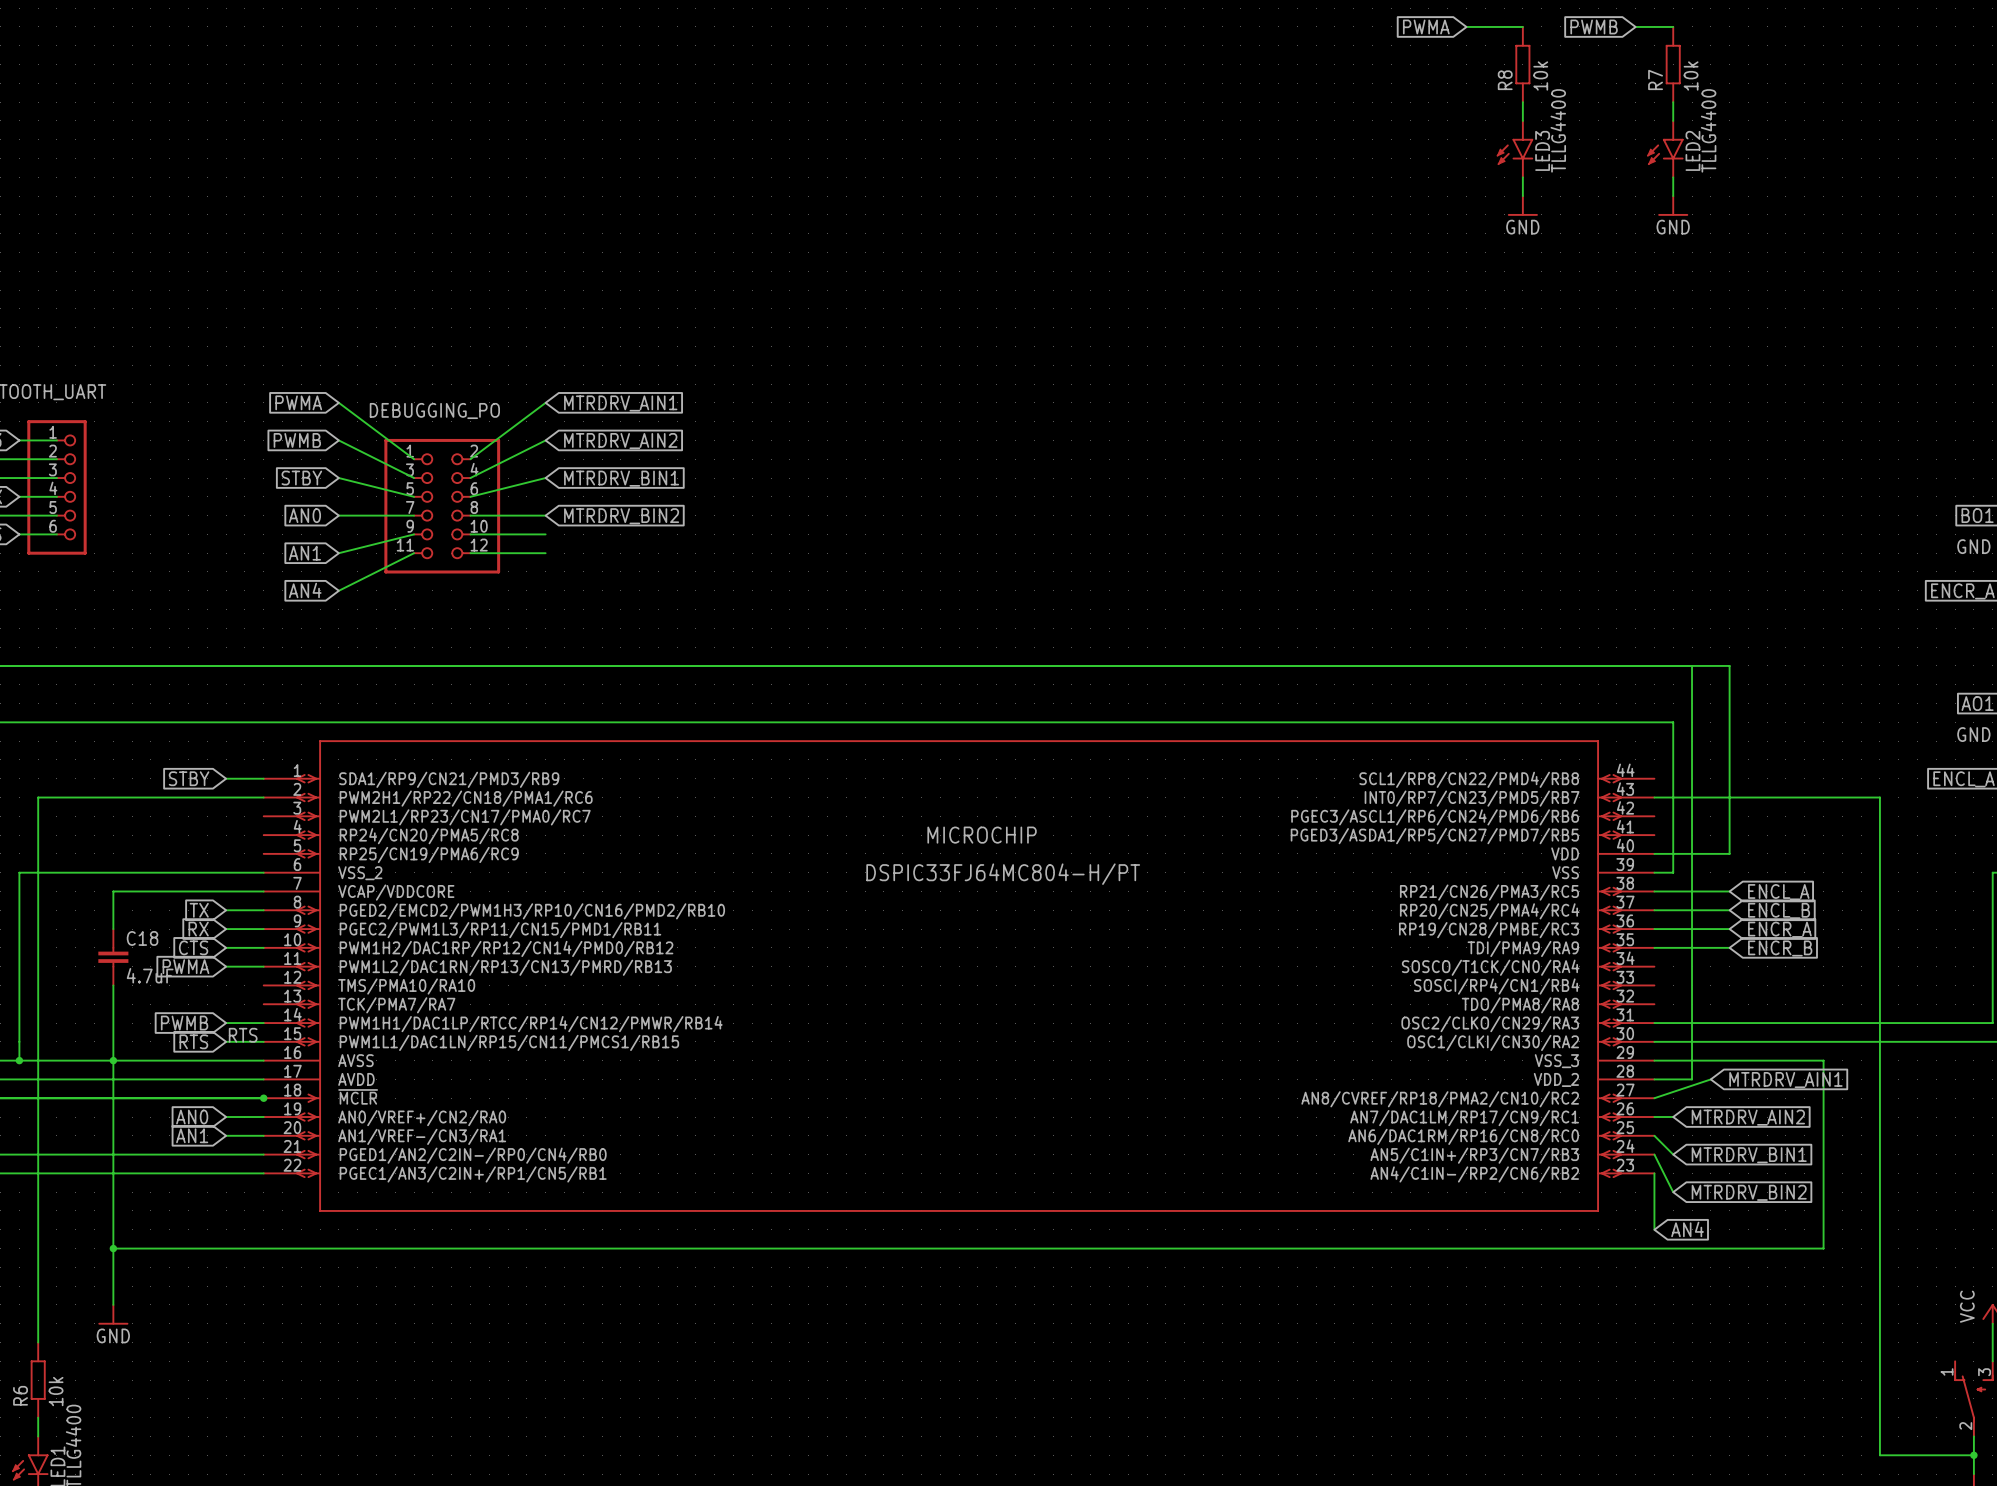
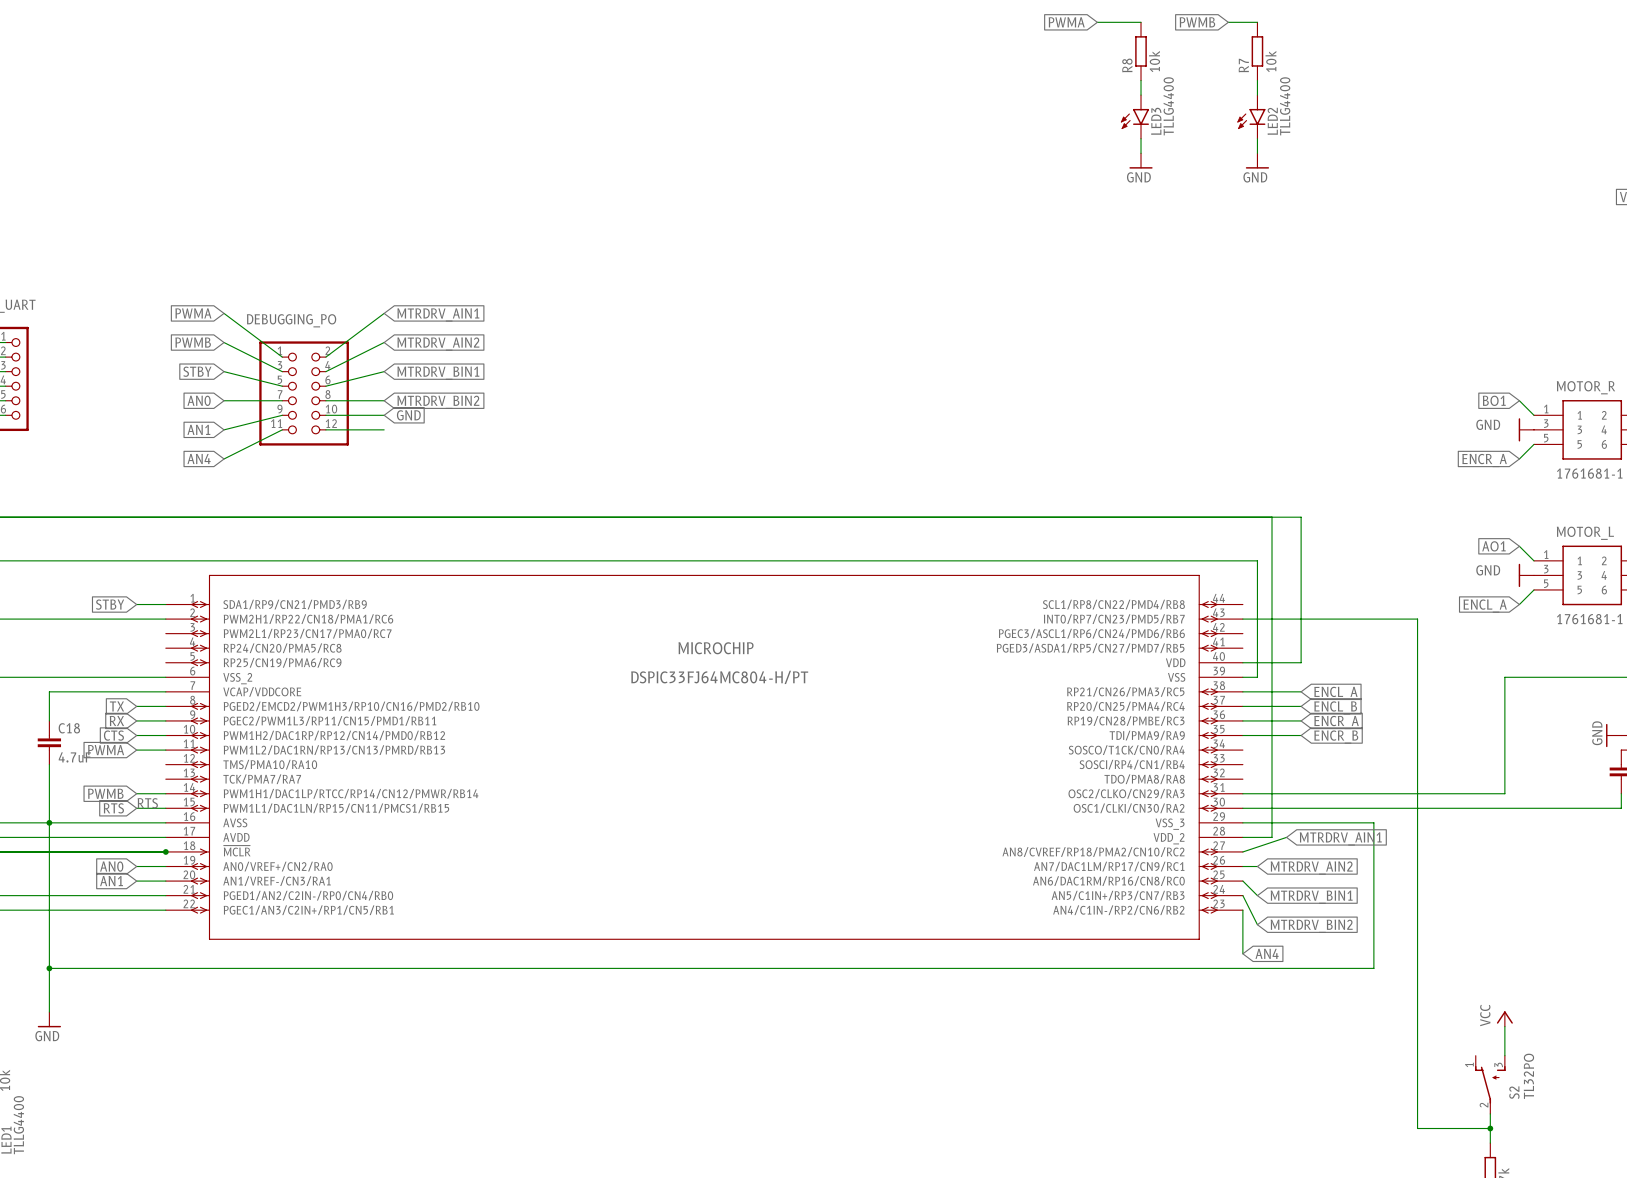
global label: none -> GND (408, 415)

